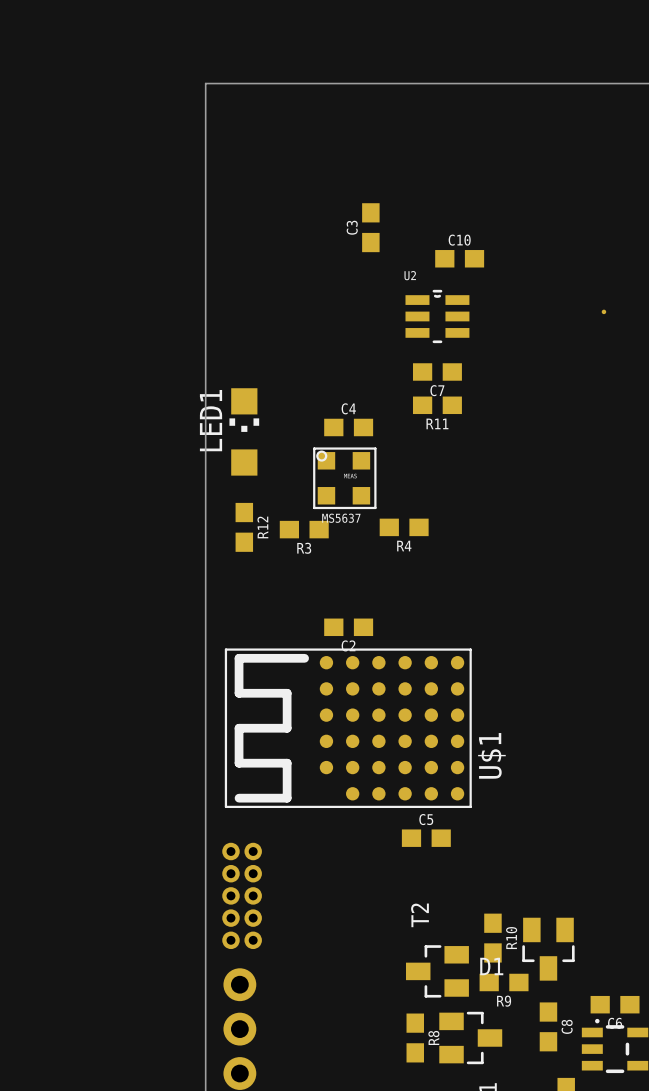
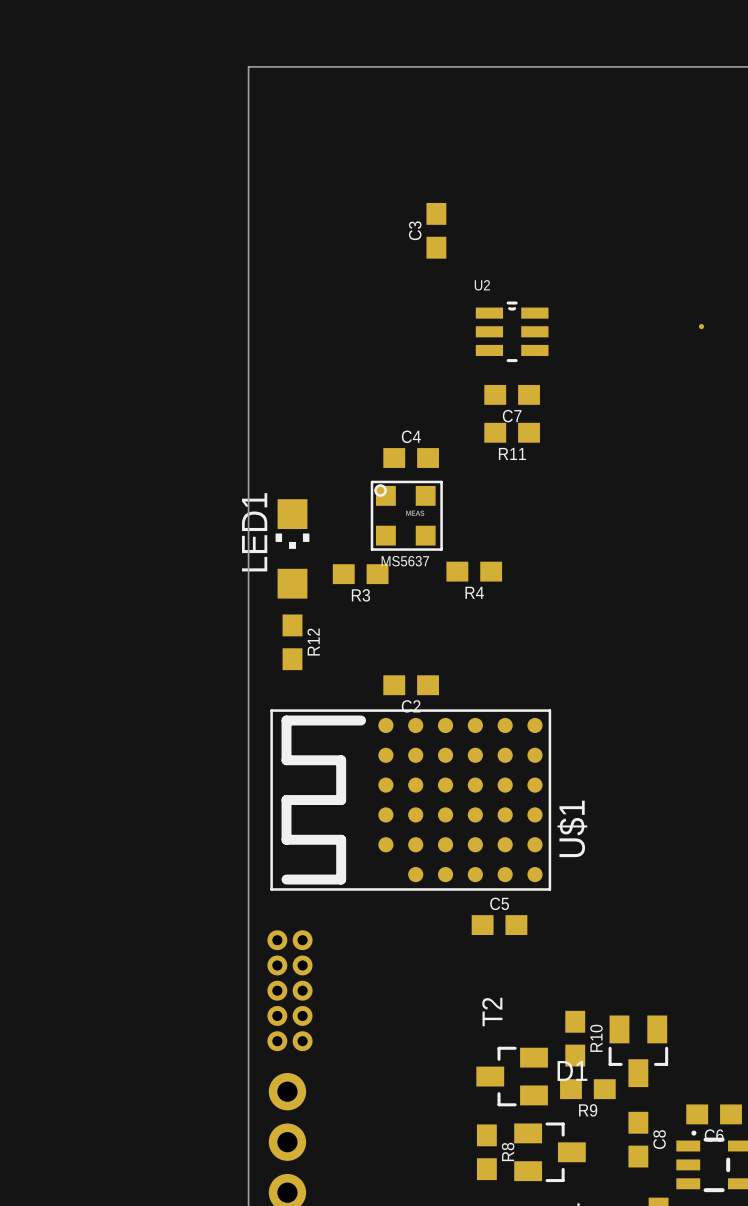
C10: (459, 258) -> none
LED1 position: (244, 431) -> (292, 548)
R12 position: (244, 527) -> (292, 642)

